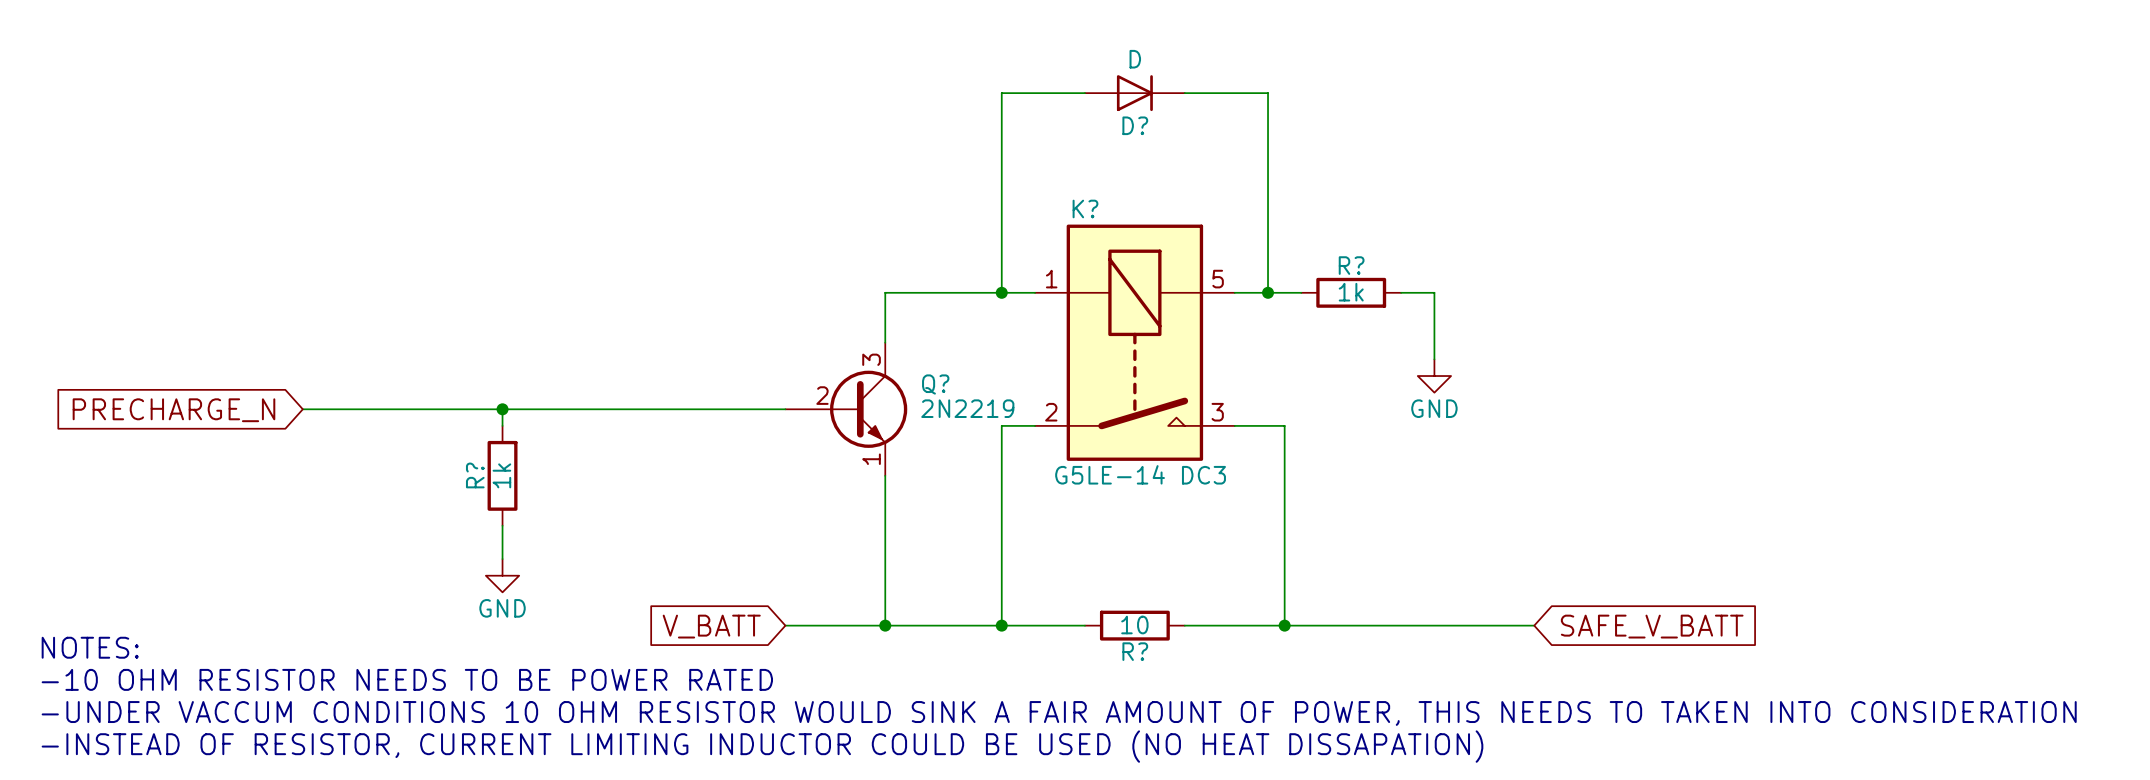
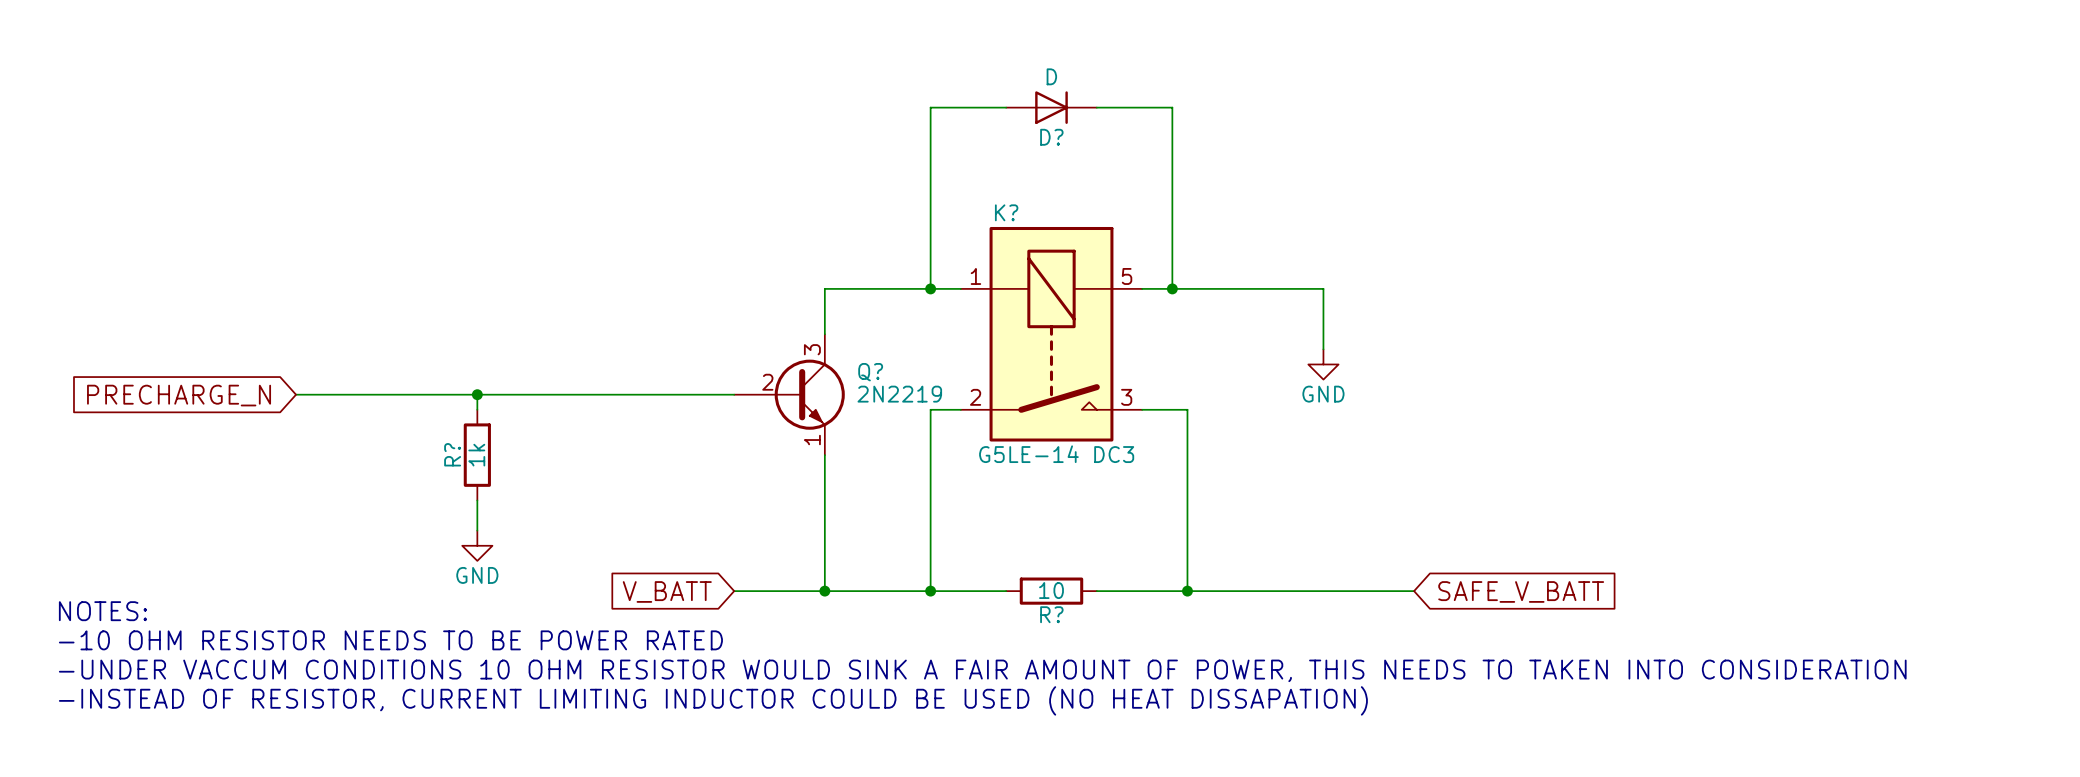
wire: none -> (1202, 288) (1293, 288)
R?: 1k (1351, 292) -> none

